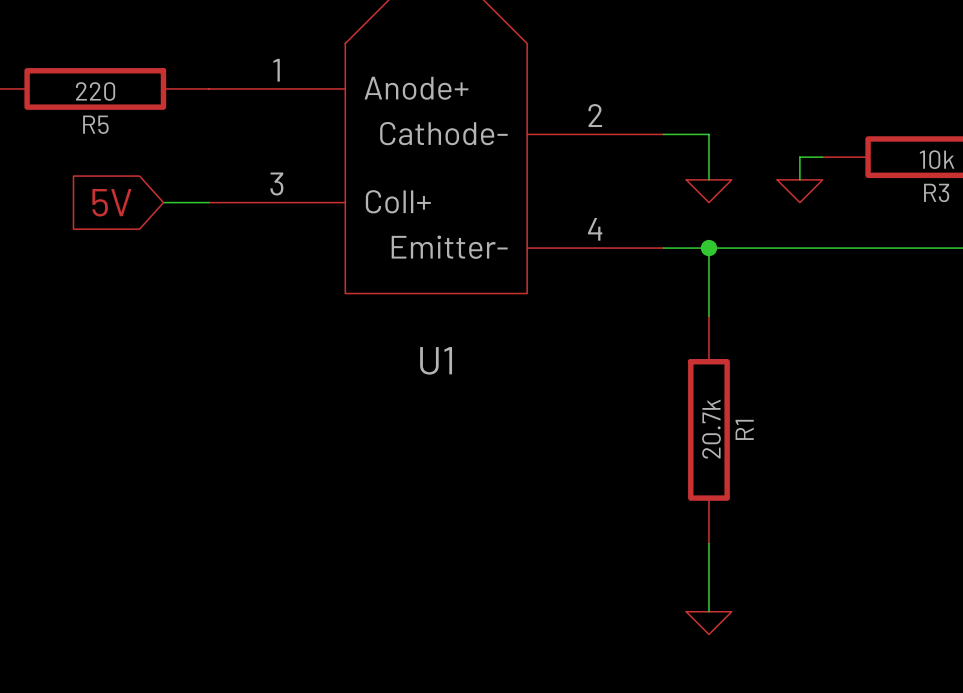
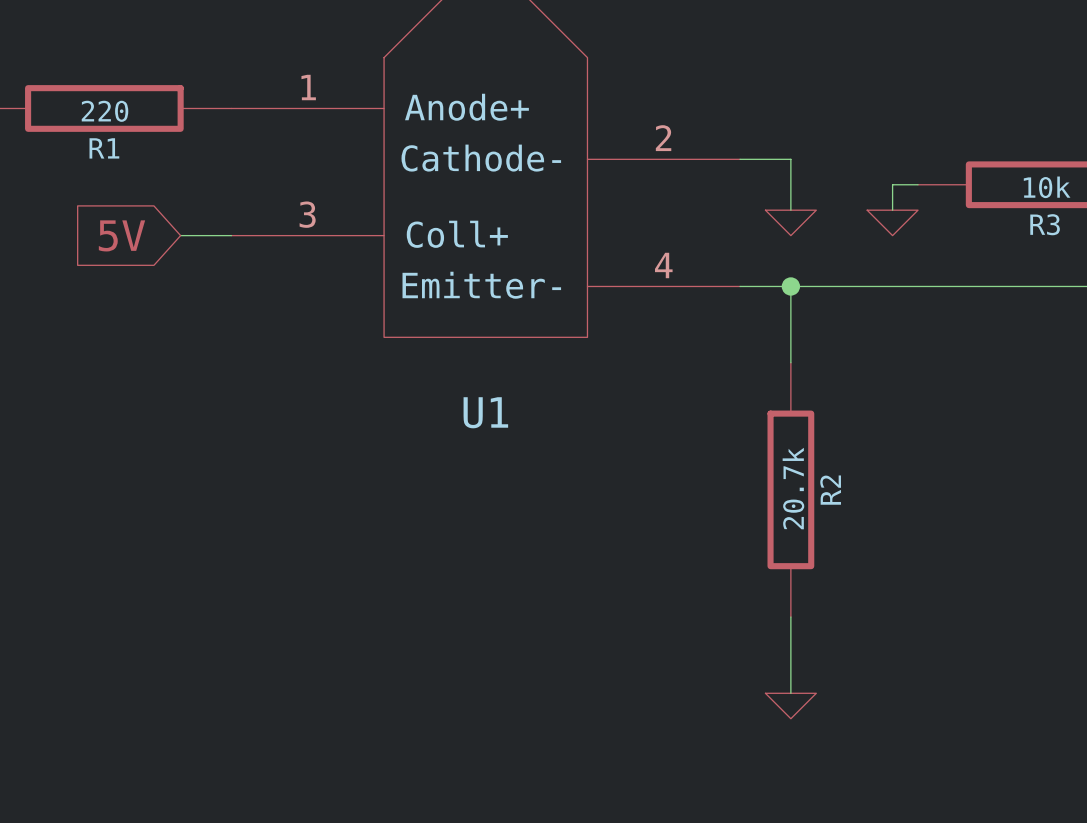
R5 name: R5 (95, 124) -> R1 (104, 148)
R1 name: R1 (744, 429) -> R2 (830, 490)

